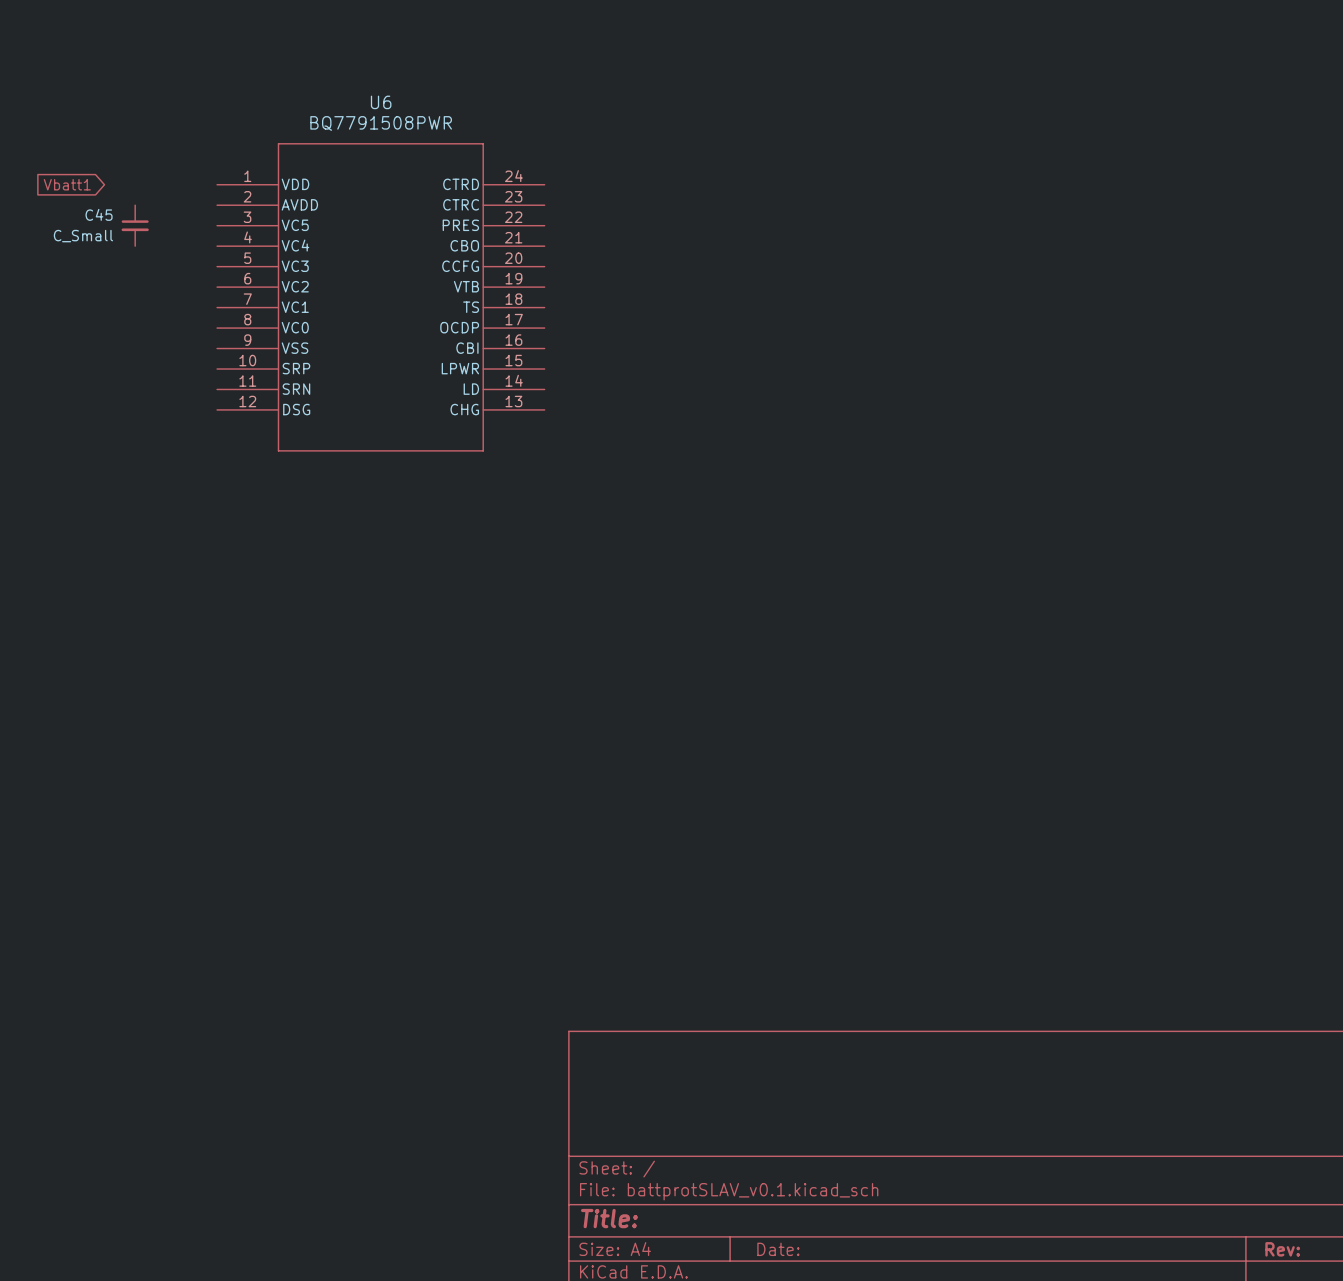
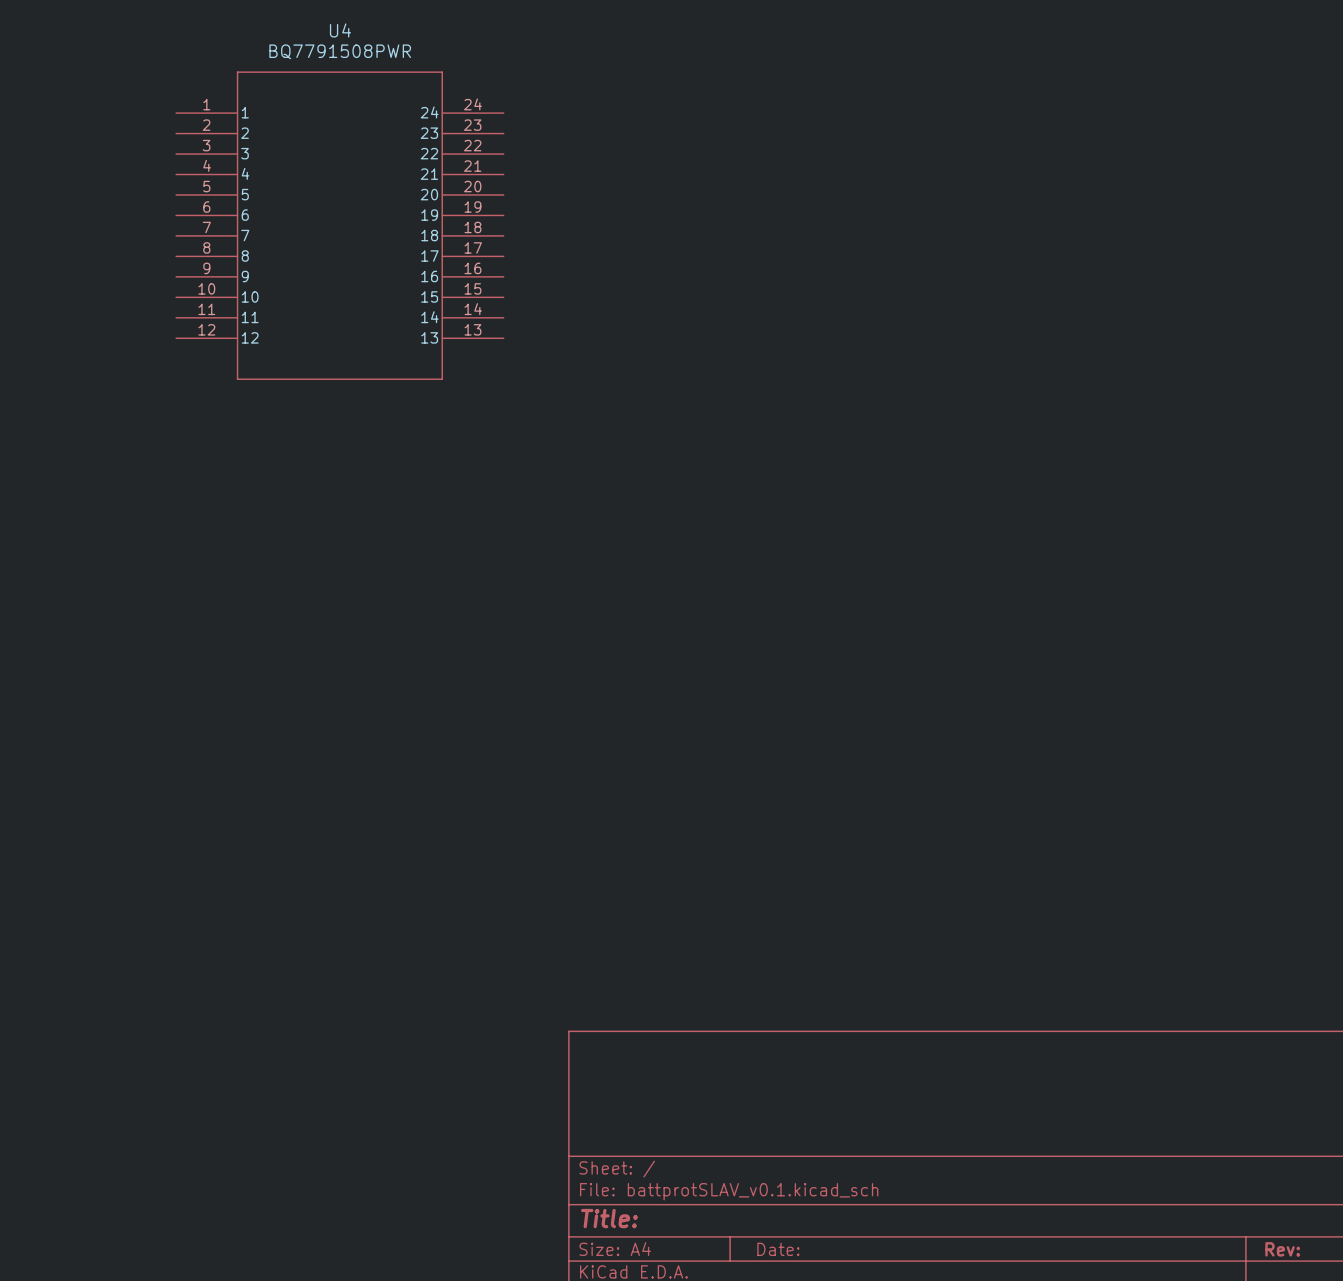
global label: Vbatt1 (67, 184) -> none
C45: C_Small (135, 225) -> none
U4: none -> BQ7791508PWR (339, 225)
U6: BQ7791508PWR (380, 297) -> none

